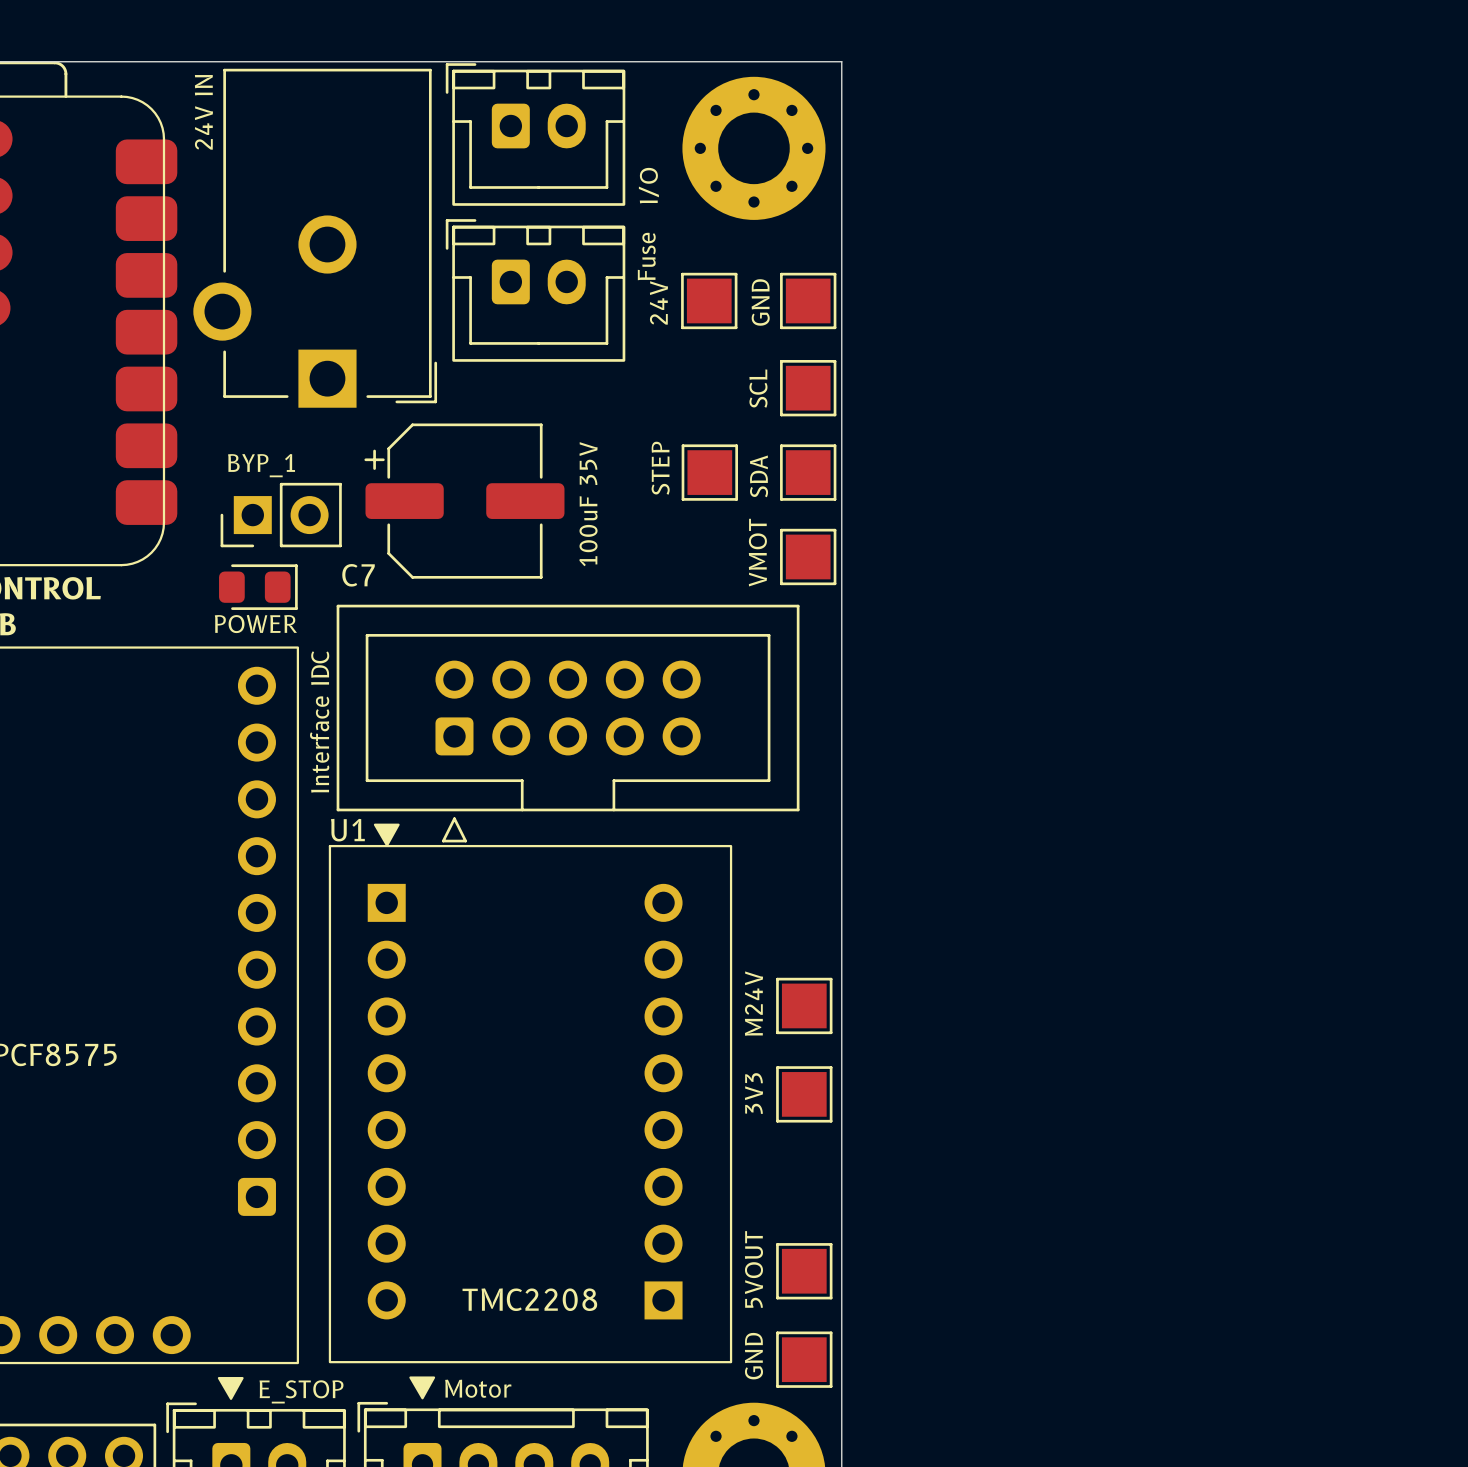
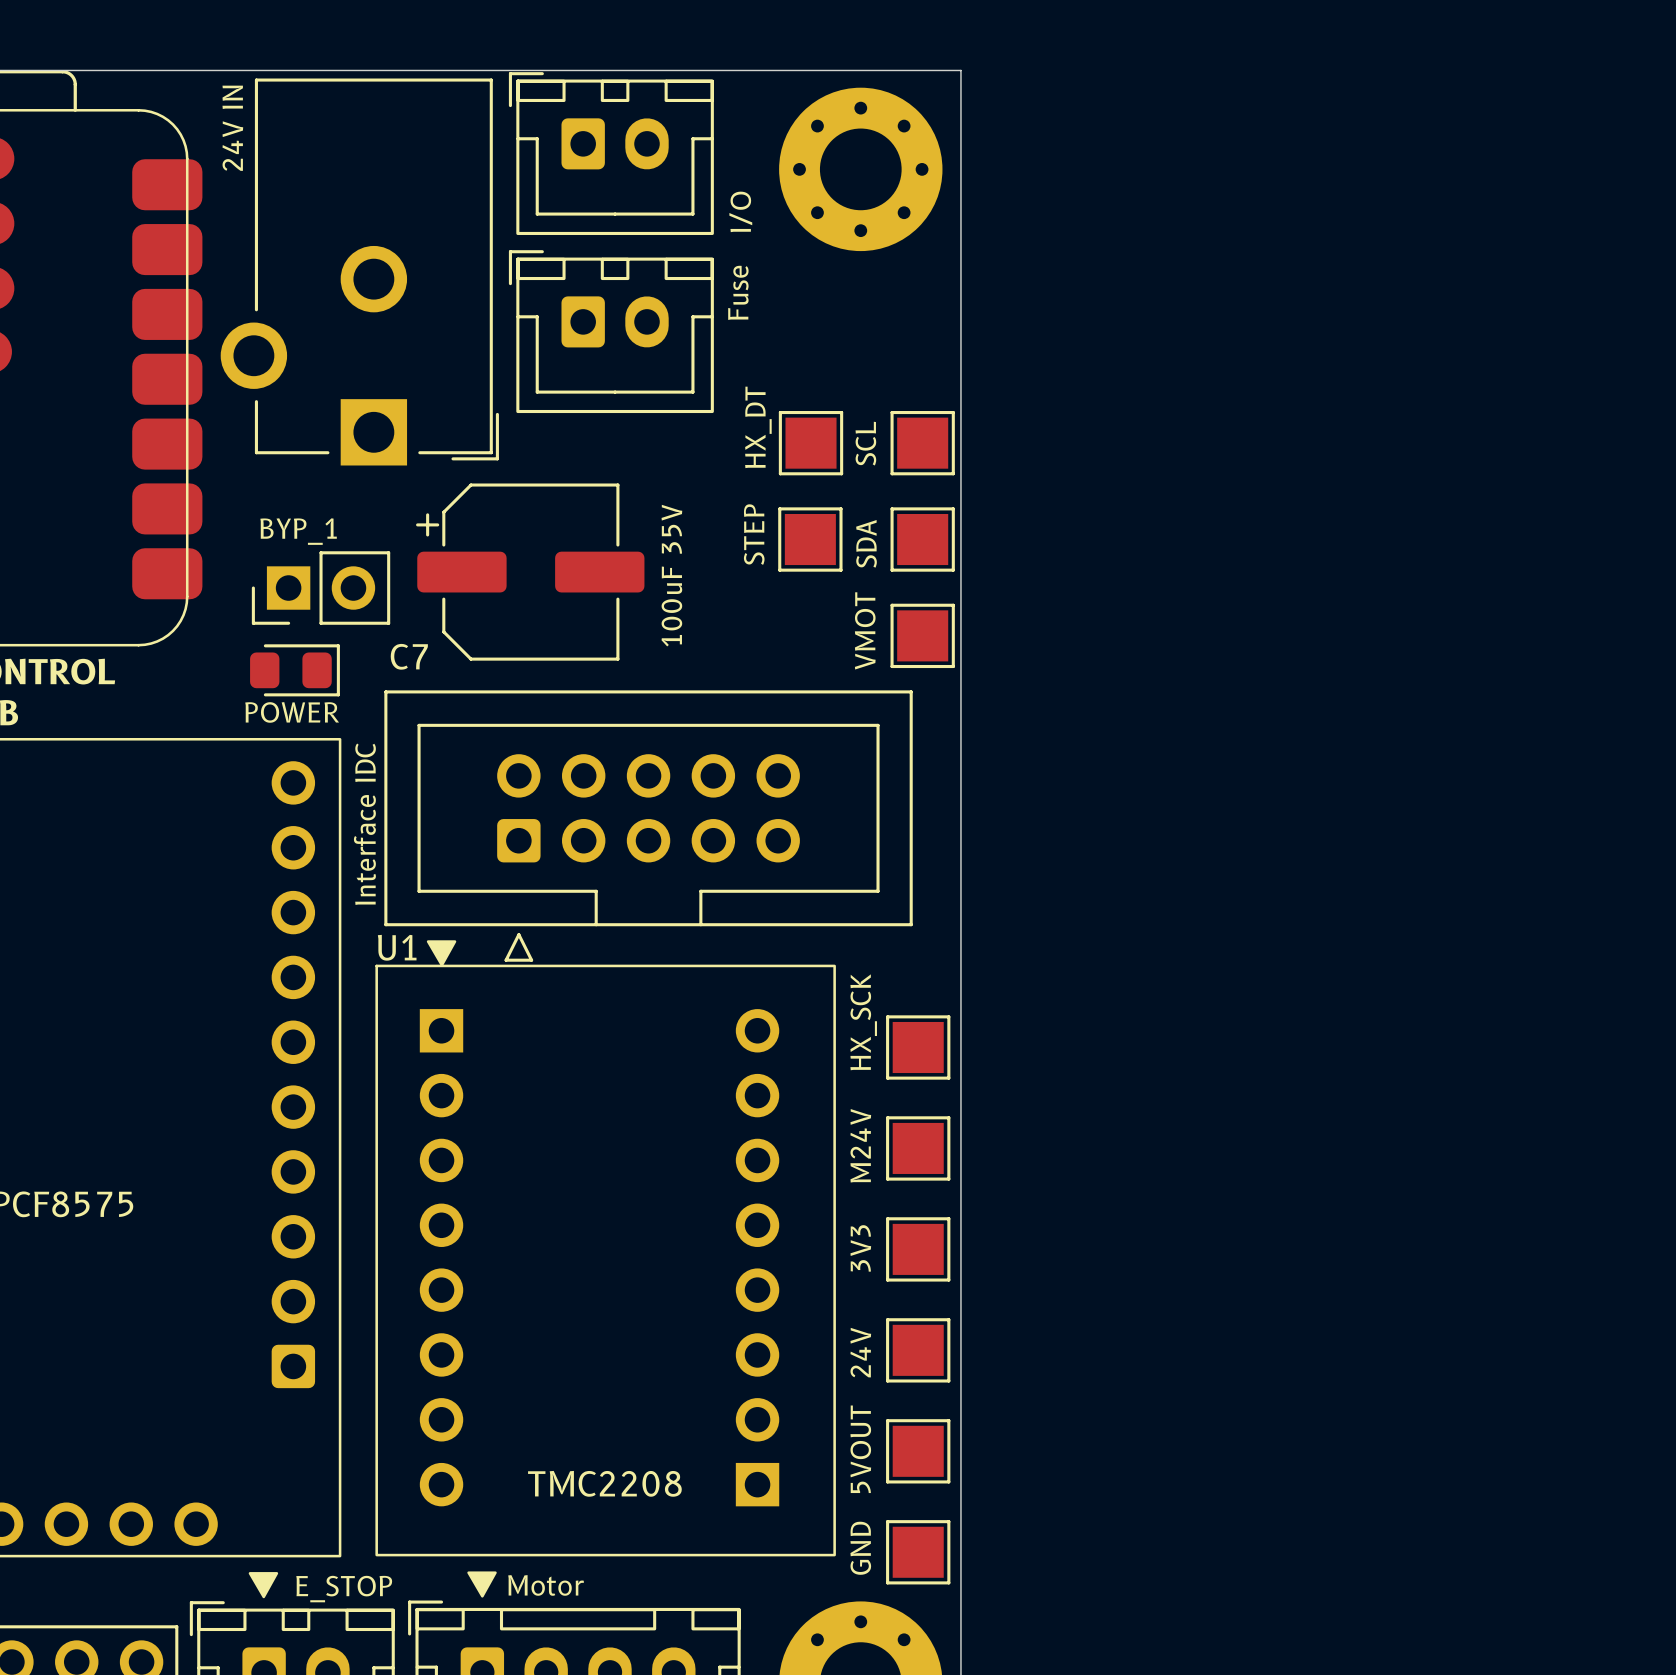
part: 24V (709, 300) -> none
part: GND (808, 300) -> none
part: none -> HX_DT (811, 443)
part: none -> HX_SCK (918, 1047)
part: none -> 24V (918, 1350)

